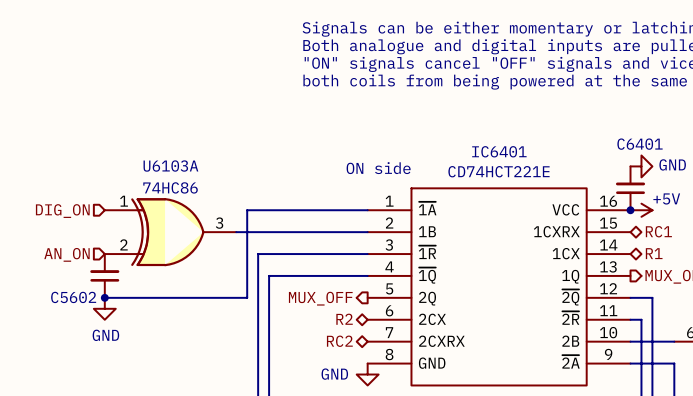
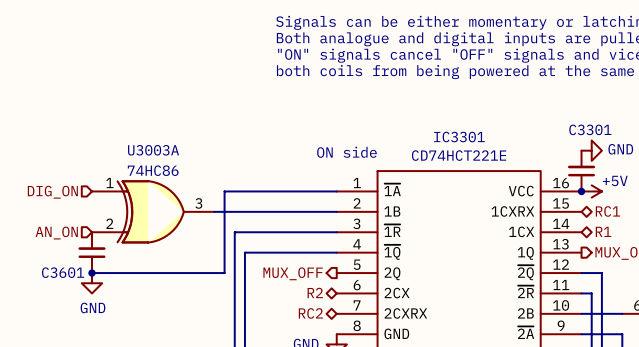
C6401 name: C6401 (640, 144) -> C3301 (590, 129)
IC6401 name: IC6401 (499, 151) -> IC3301 (459, 137)
U6103A name: U6103A (170, 166) -> U3003A (153, 150)
C5602 name: C5602 (73, 297) -> C3601 (63, 272)

